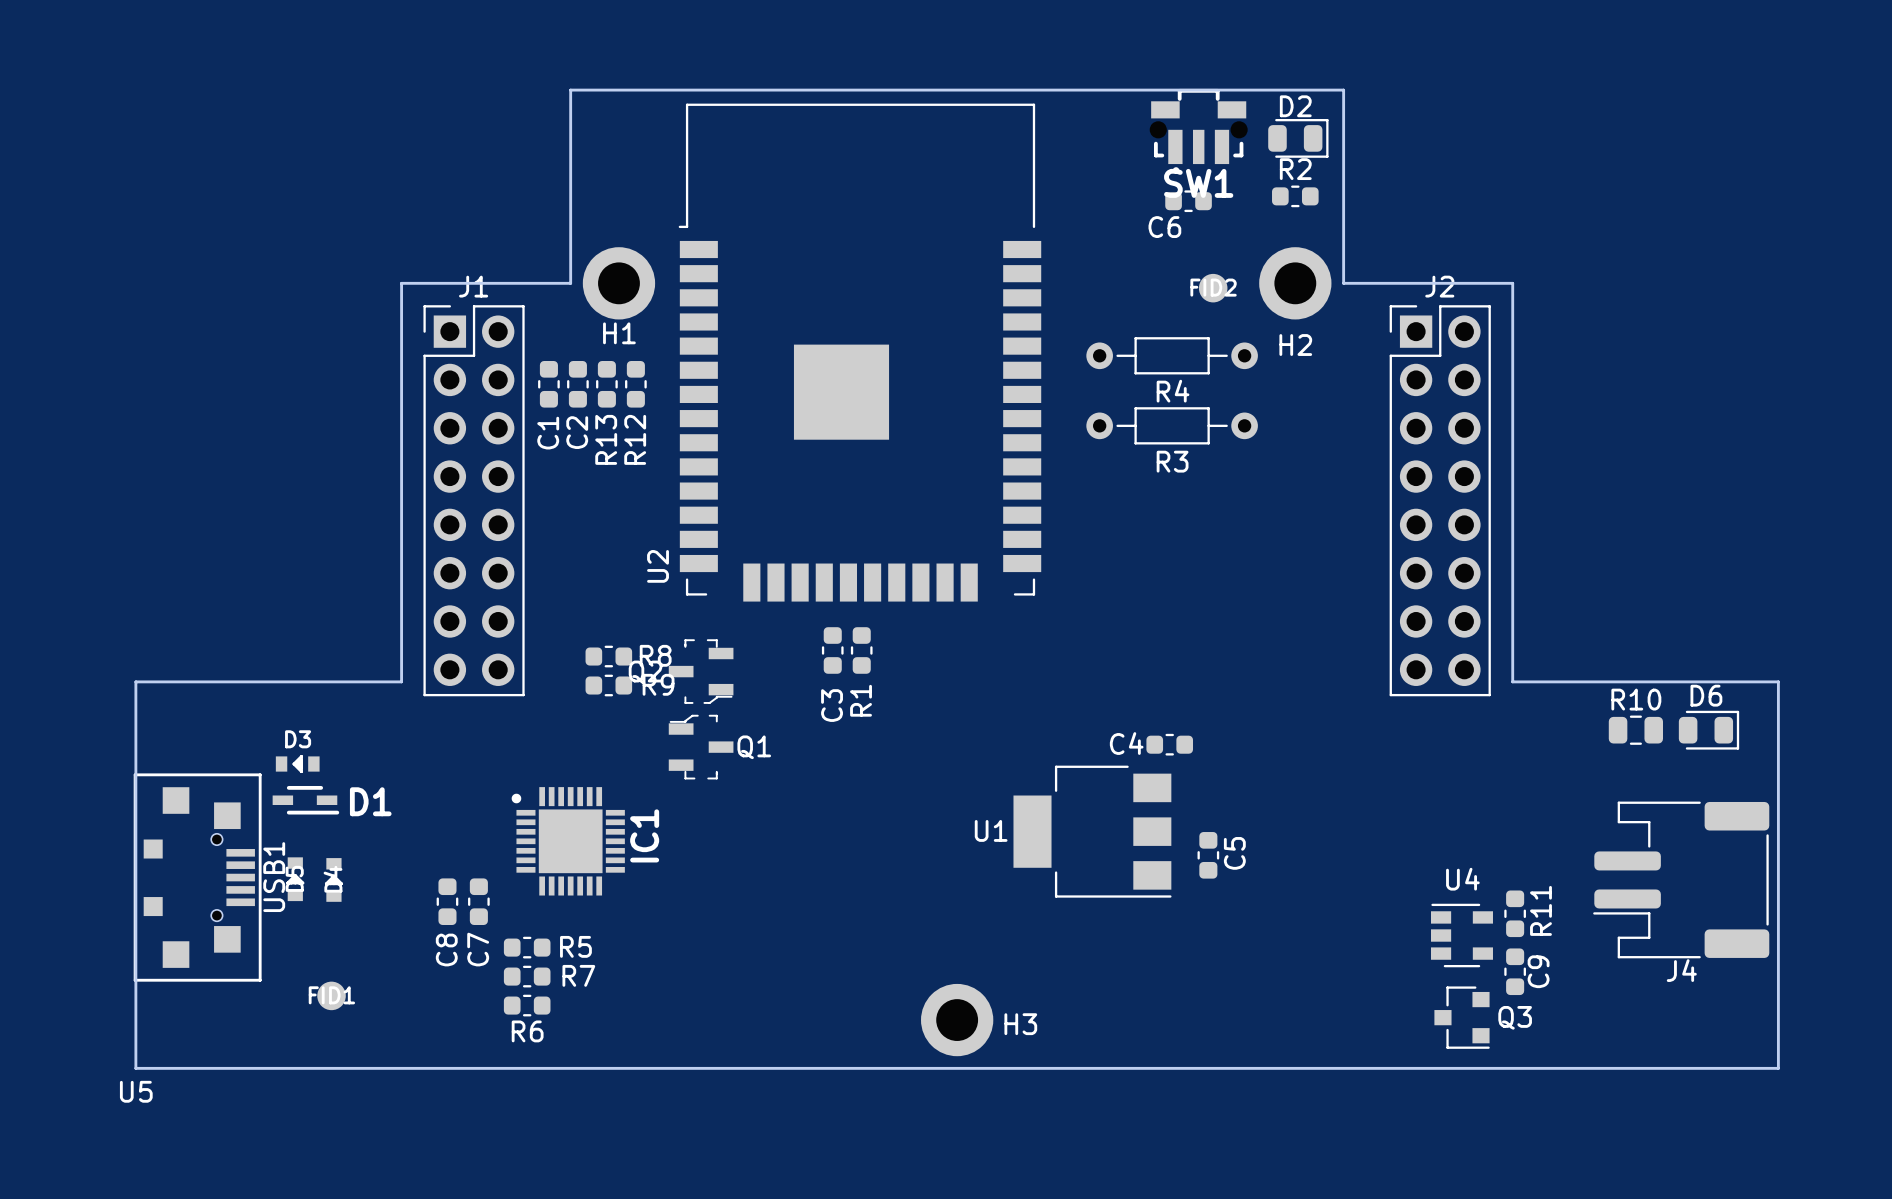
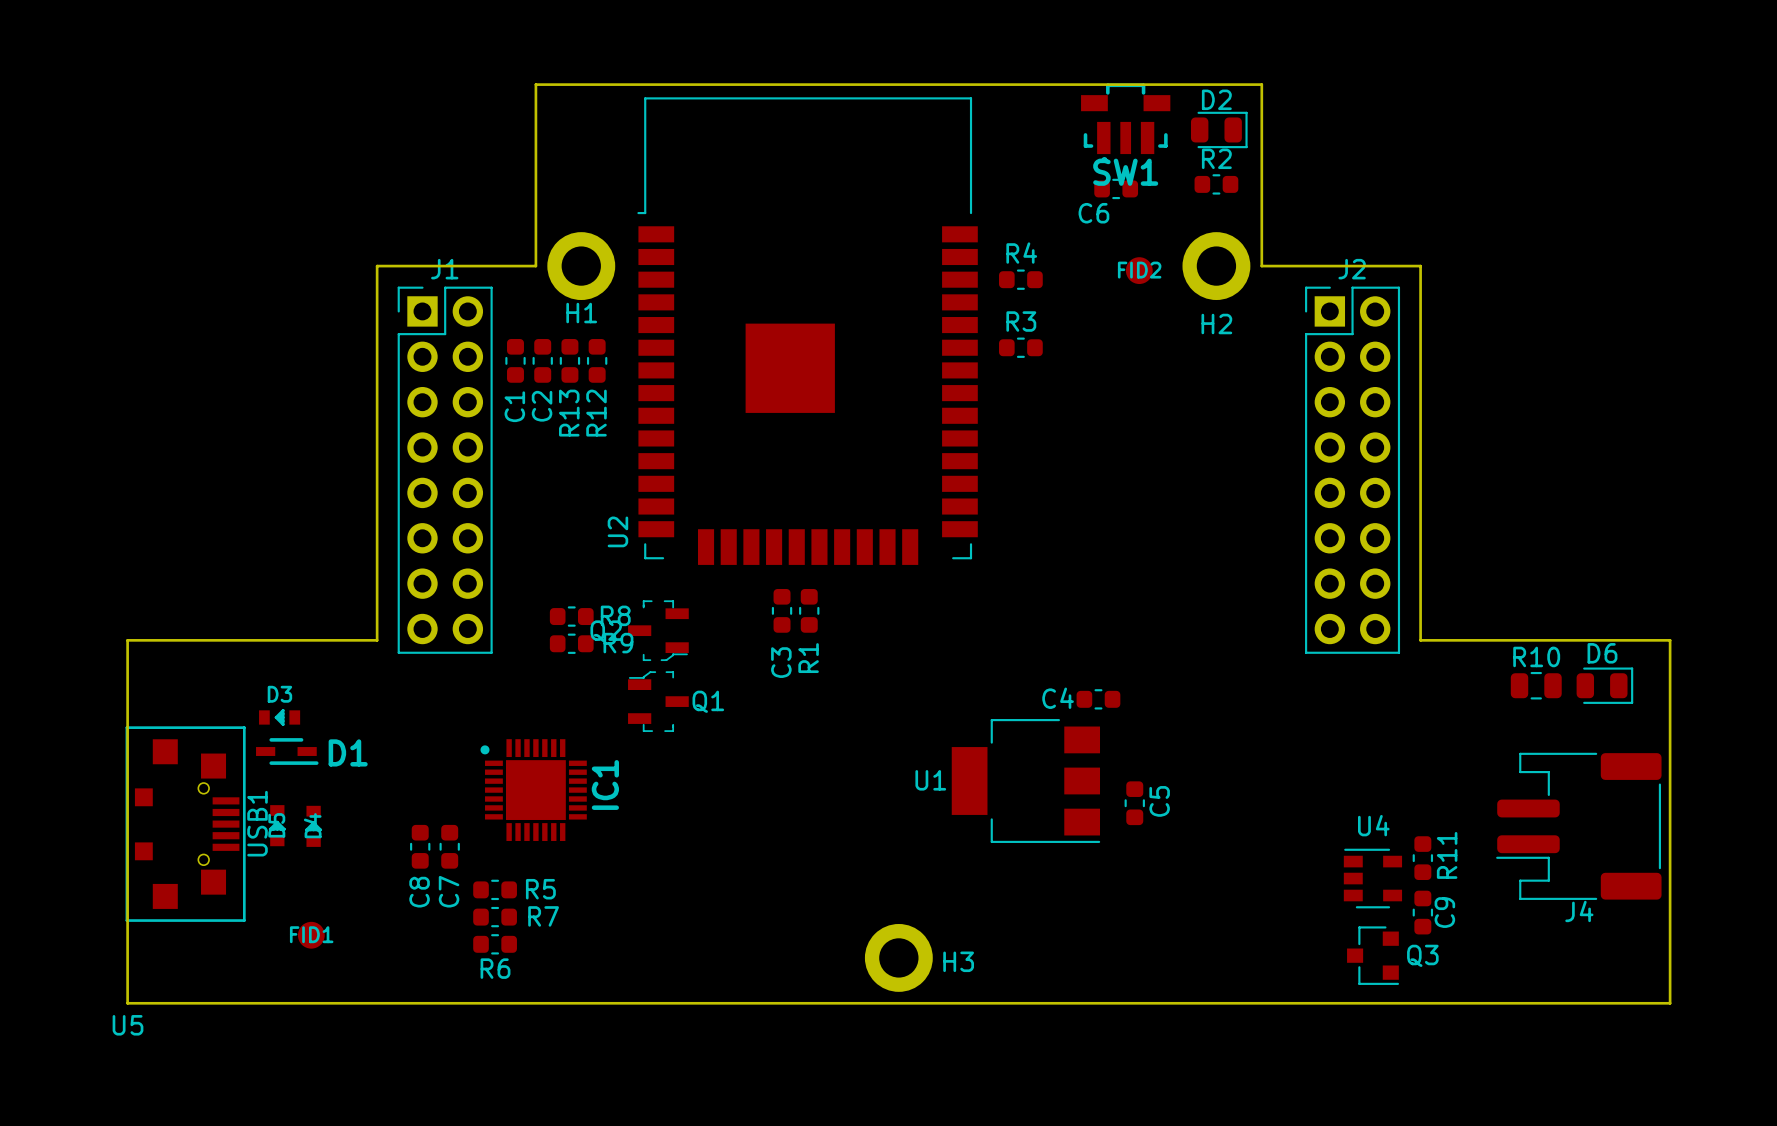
R4 footprint: [1086, 337, 1258, 375] -> [999, 269, 1043, 290]
R4 name position: R4 (1173, 391) -> R4 (1021, 253)
R3 footprint: [1086, 407, 1258, 445] -> [999, 337, 1043, 358]
R3 name position: R3 (1172, 461) -> R3 (1021, 321)

